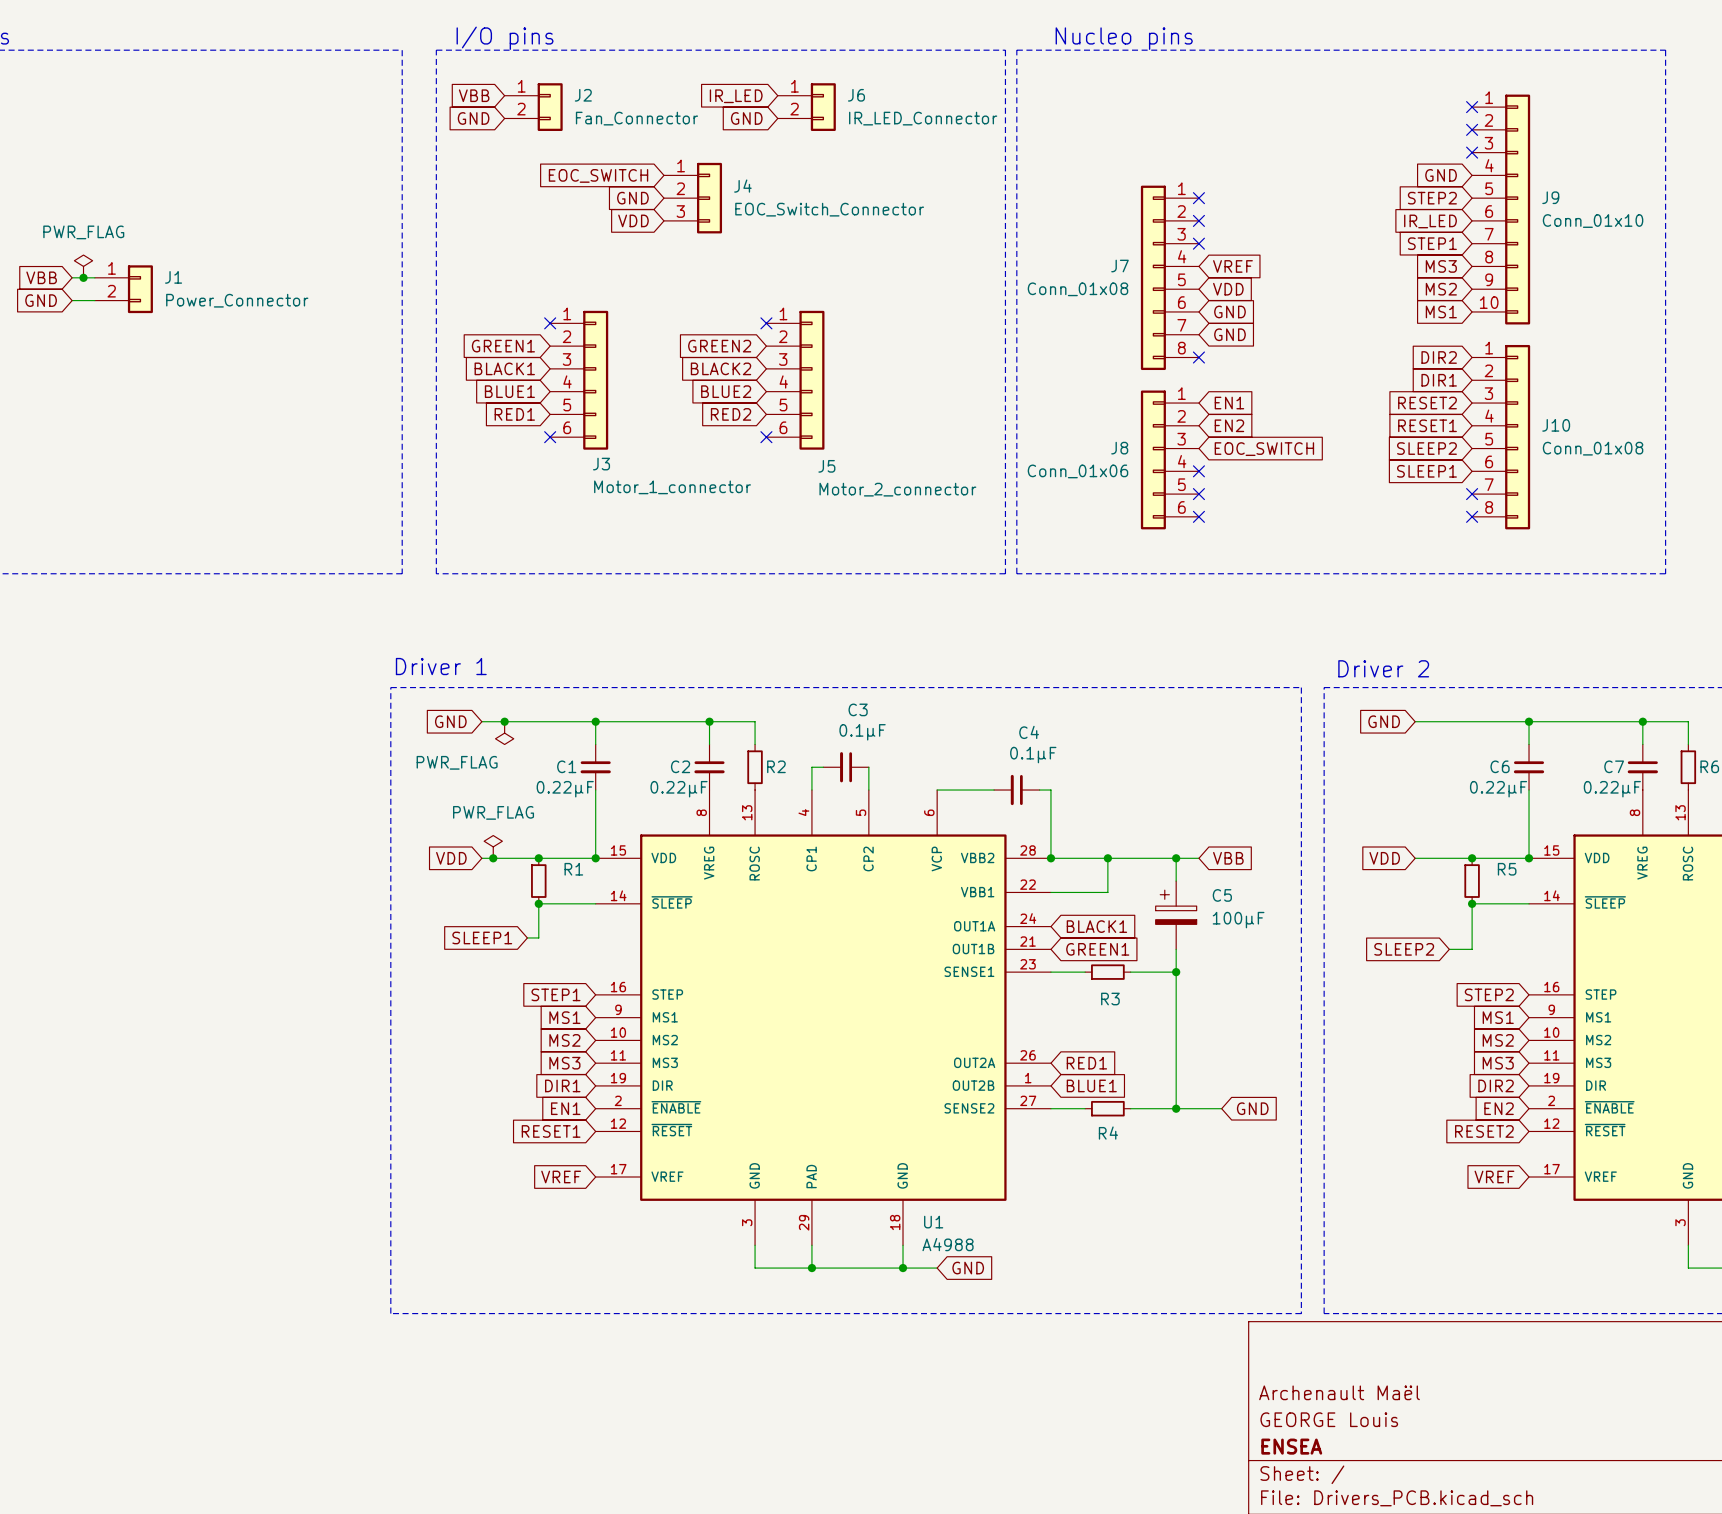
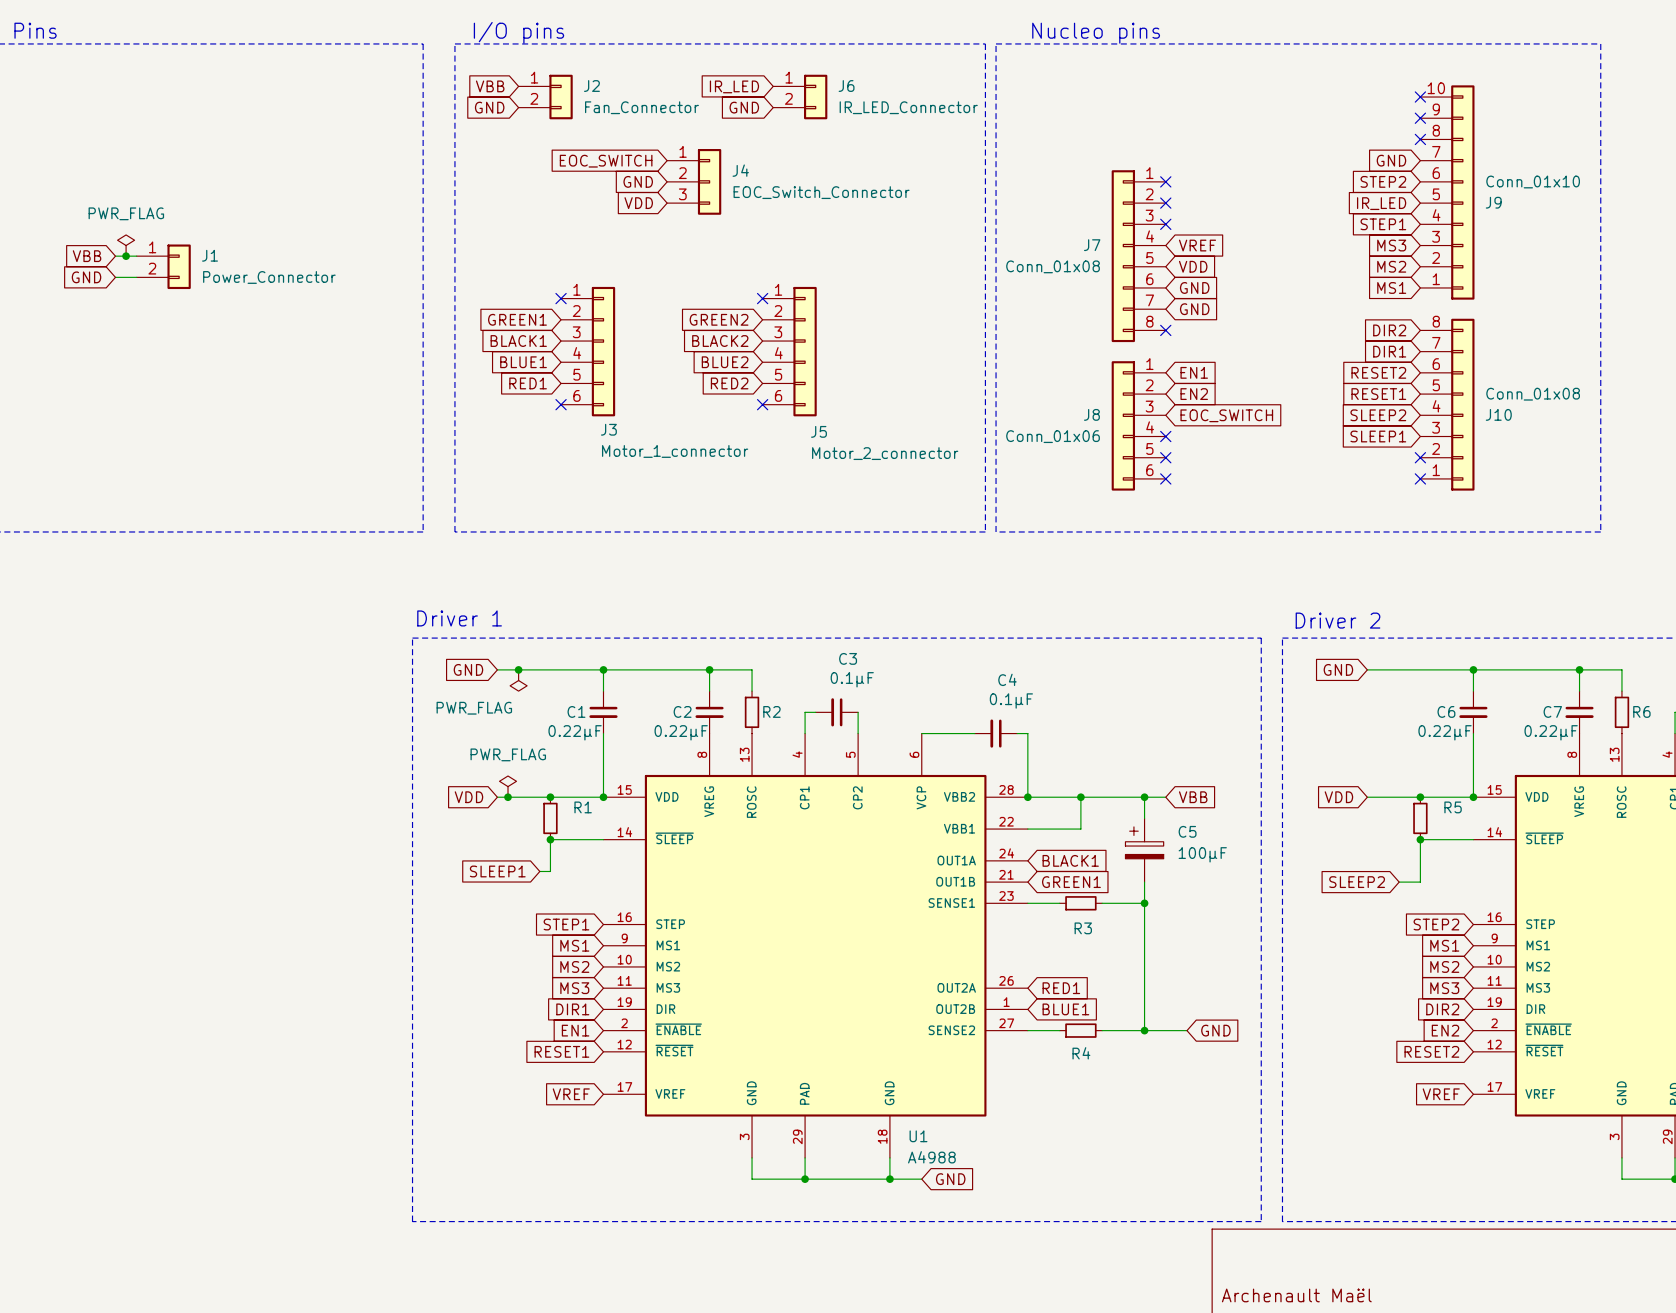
J9 flip: as is (1517, 209) -> up-down (1462, 192)
J10 flip: as is (1517, 437) -> up-down (1462, 404)

